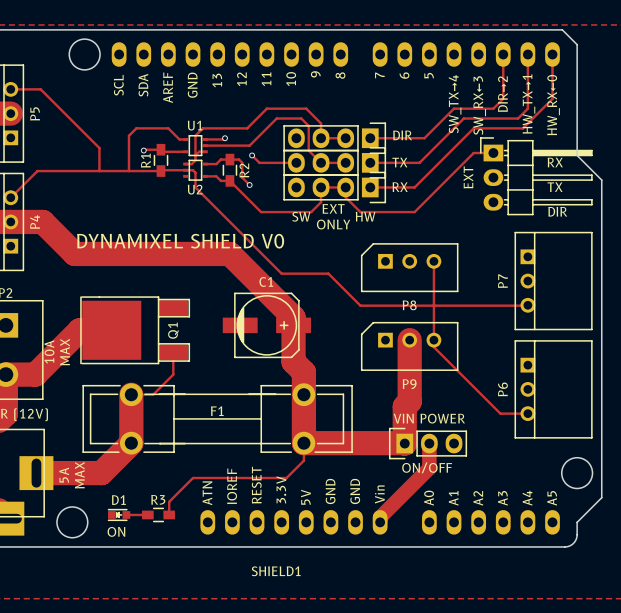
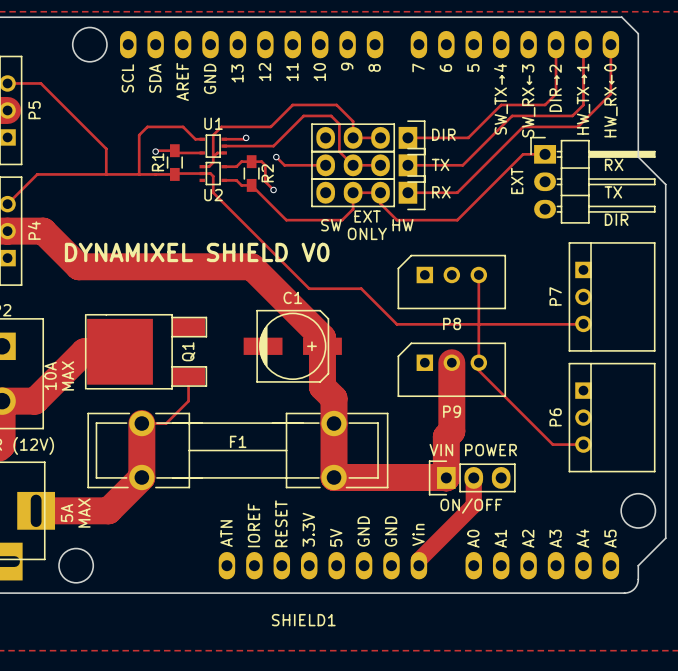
track: (303, 443) (303, 460) (286, 478) (193, 478) (169, 501) (169, 514) -> none
D1: (119, 514) -> none
track: (126, 514) (147, 514) -> none
R3: (158, 514) -> none
text: ON (116, 531) -> none

